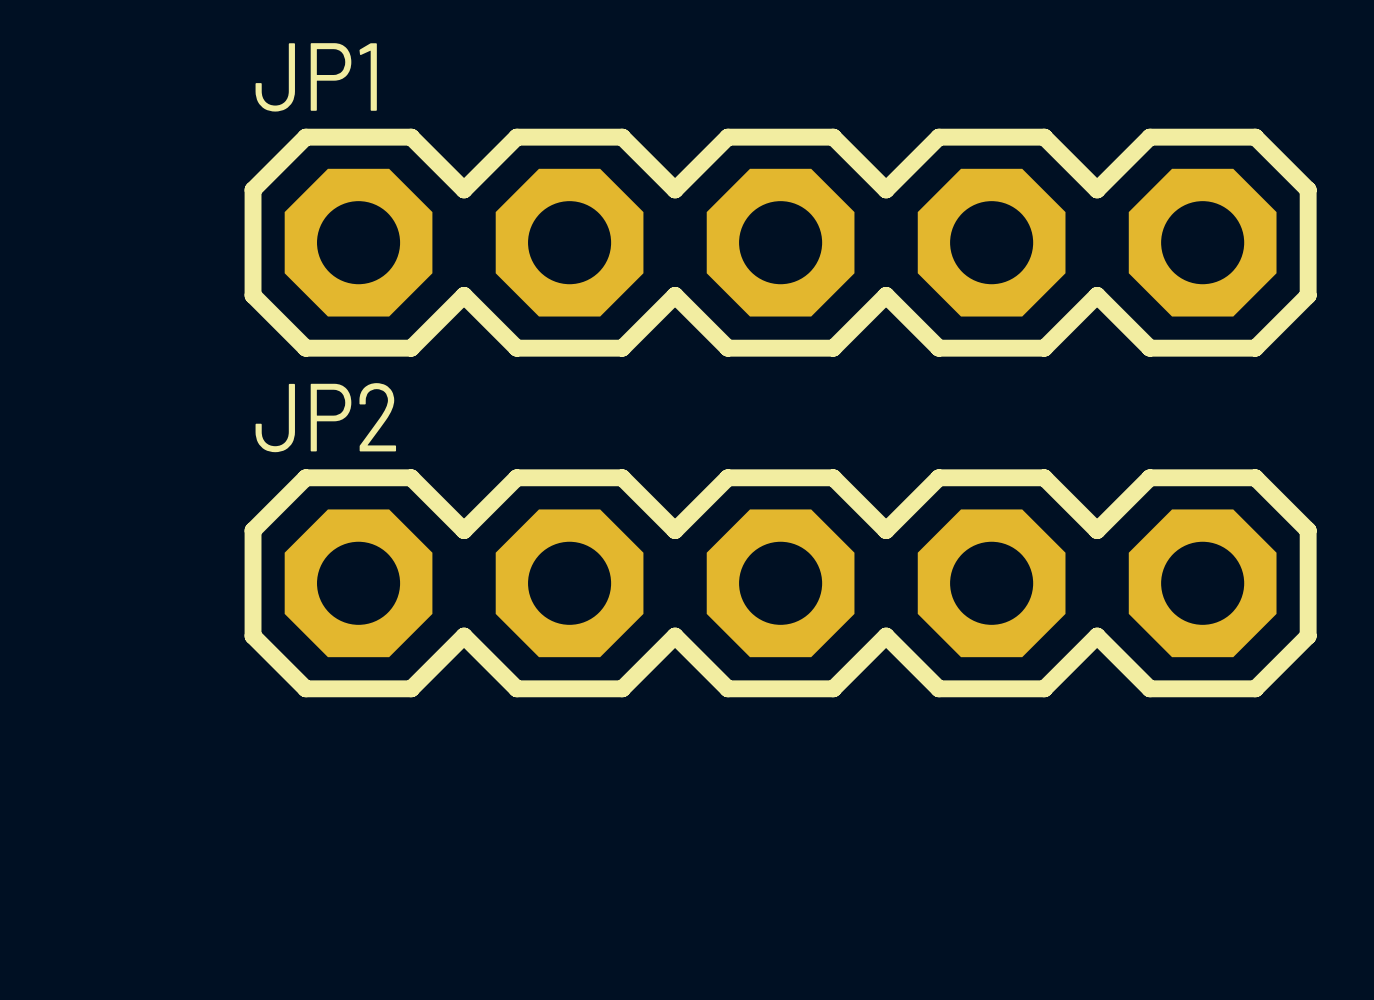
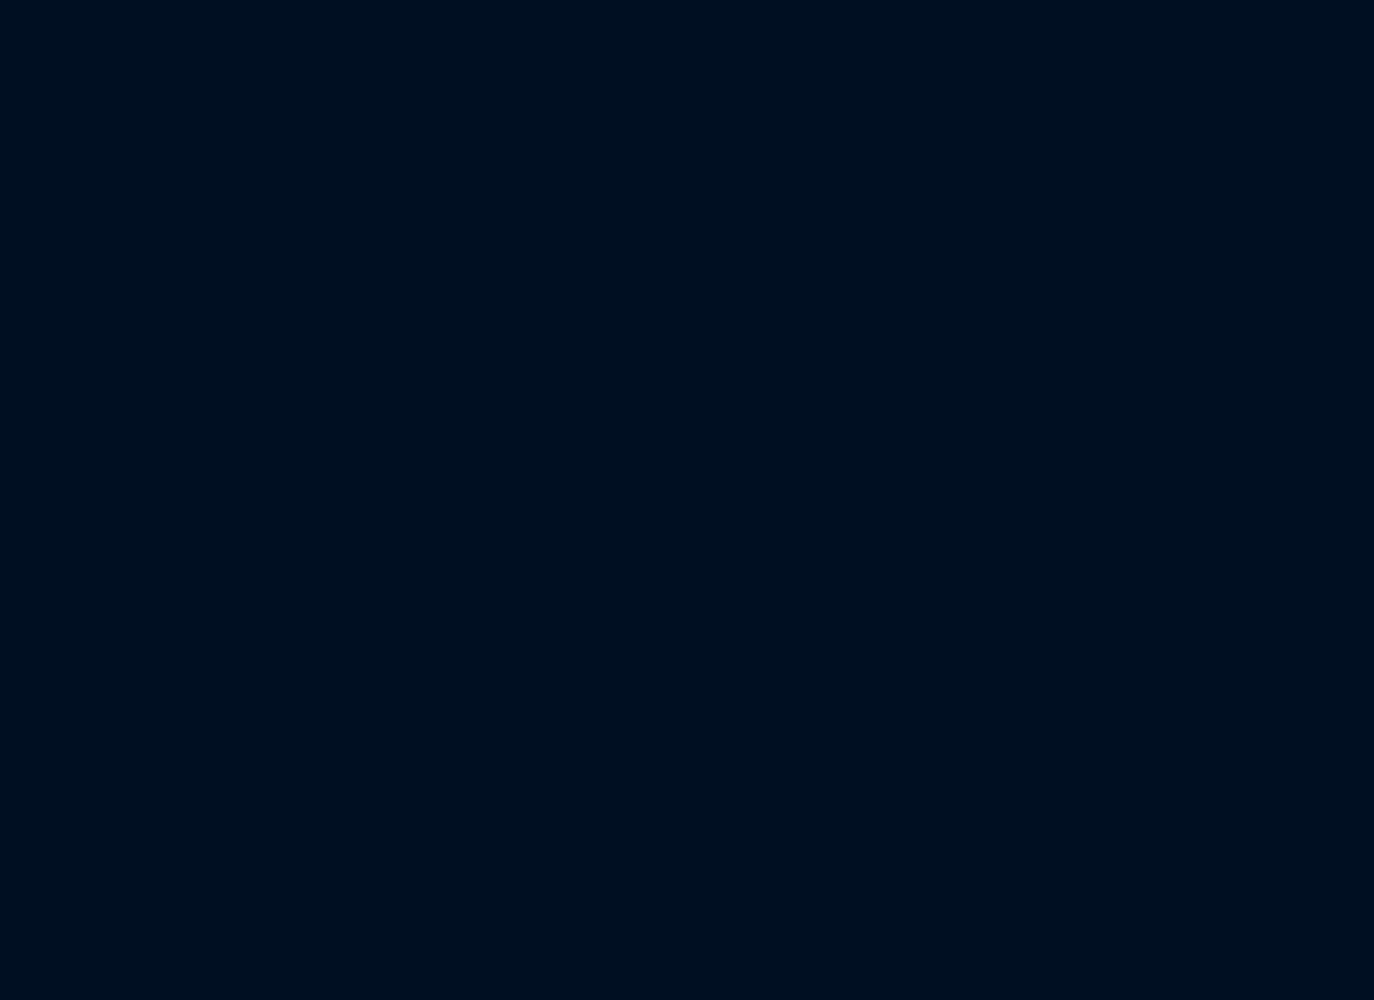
JP1: (780, 242) -> none
JP2: (780, 583) -> none

